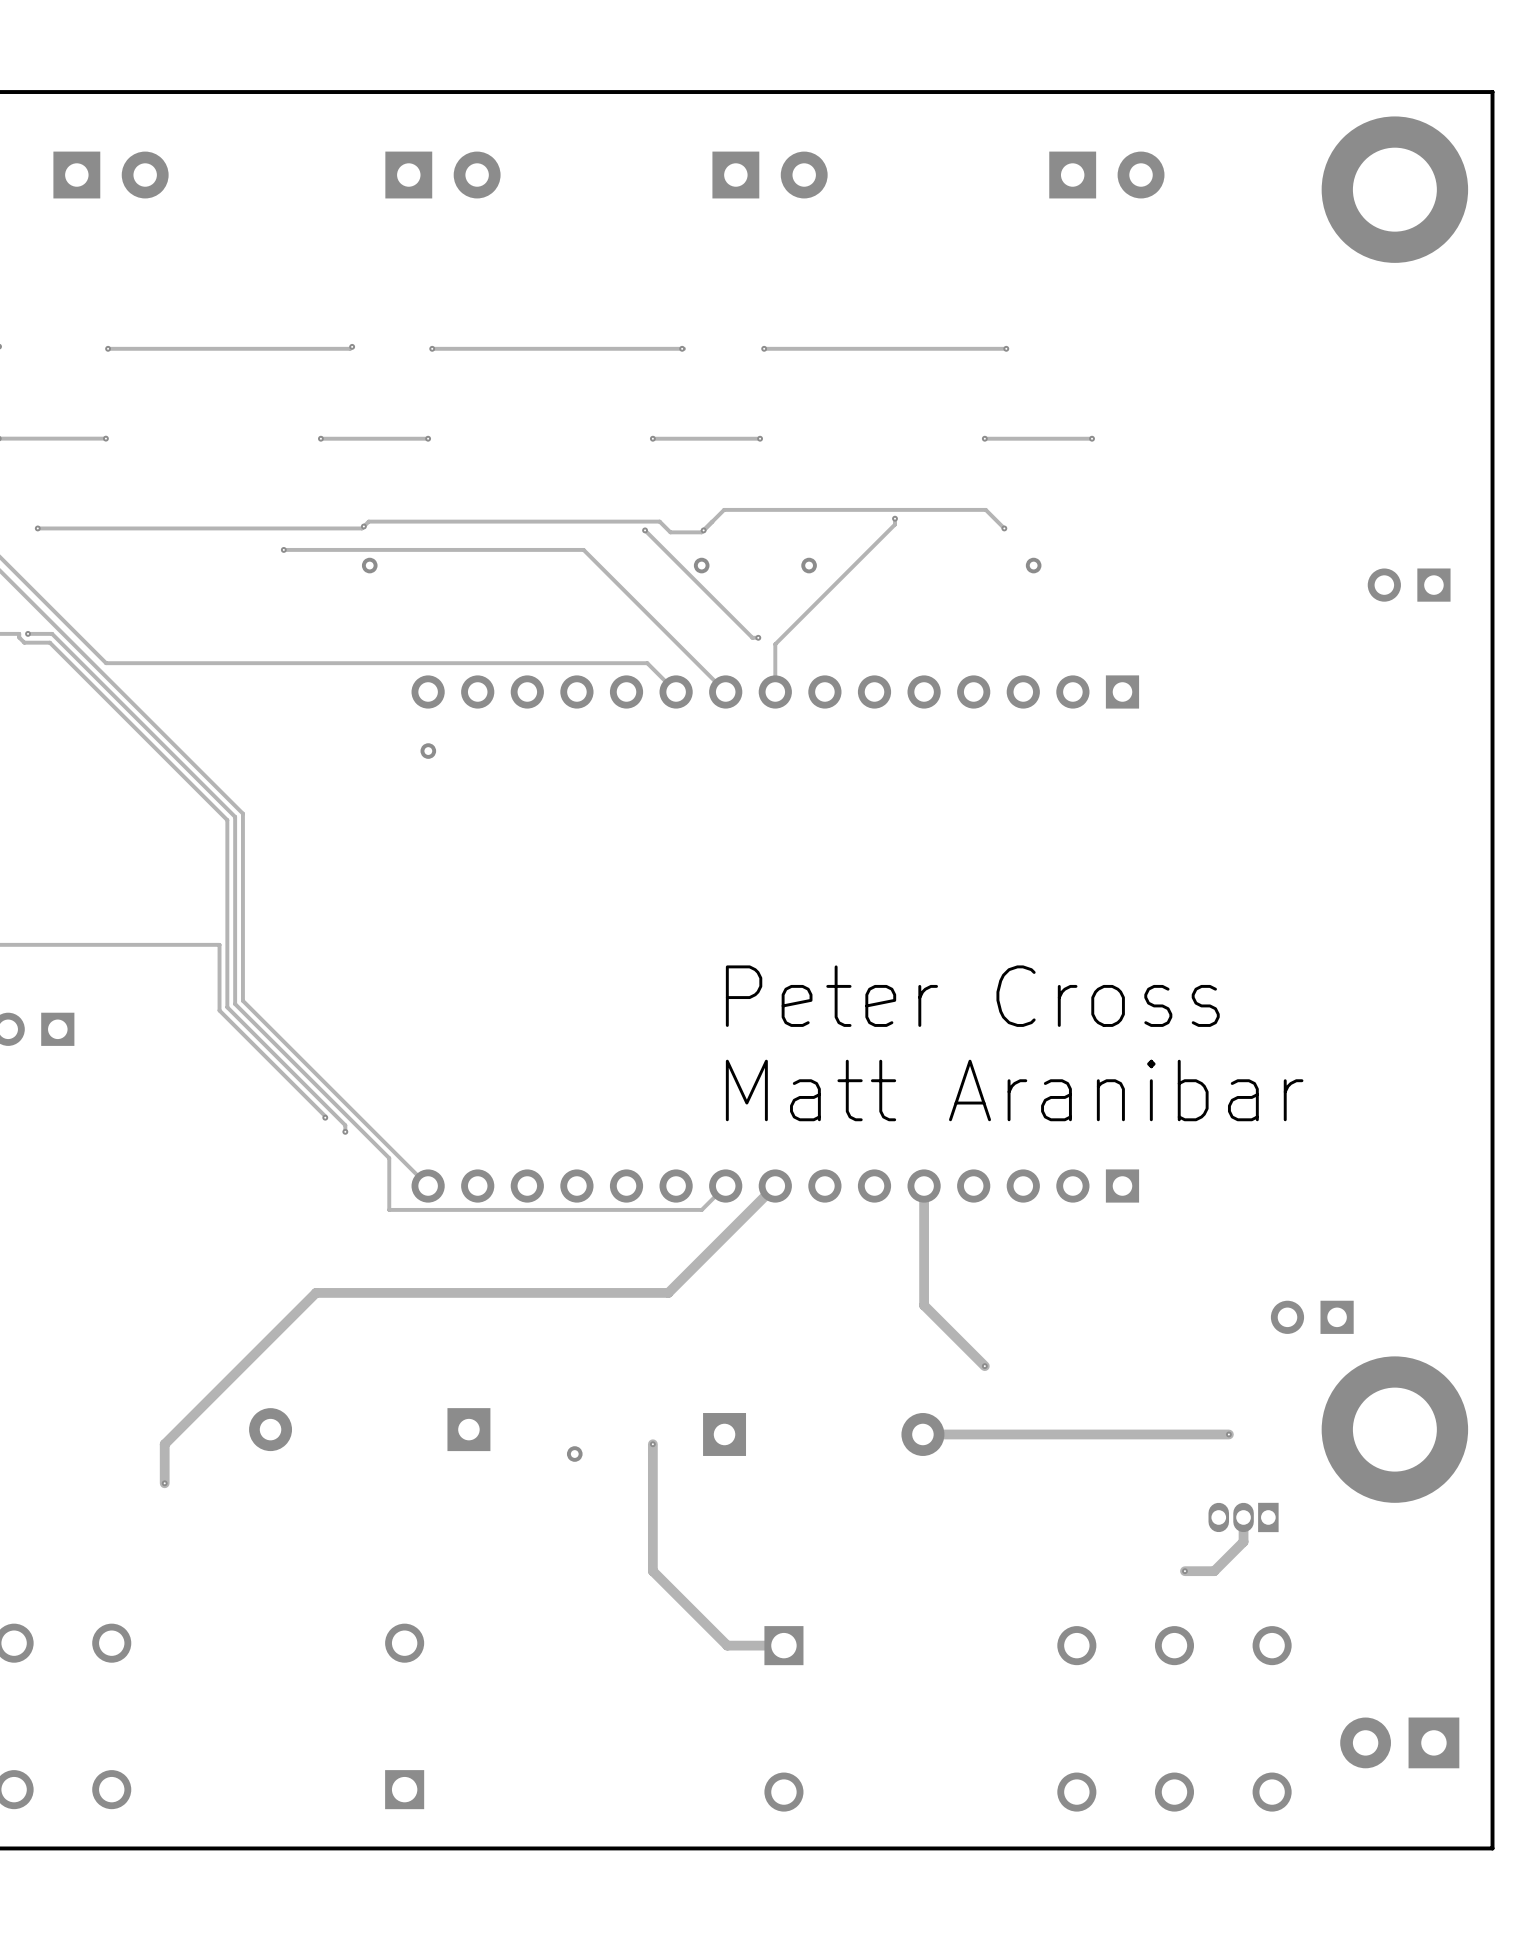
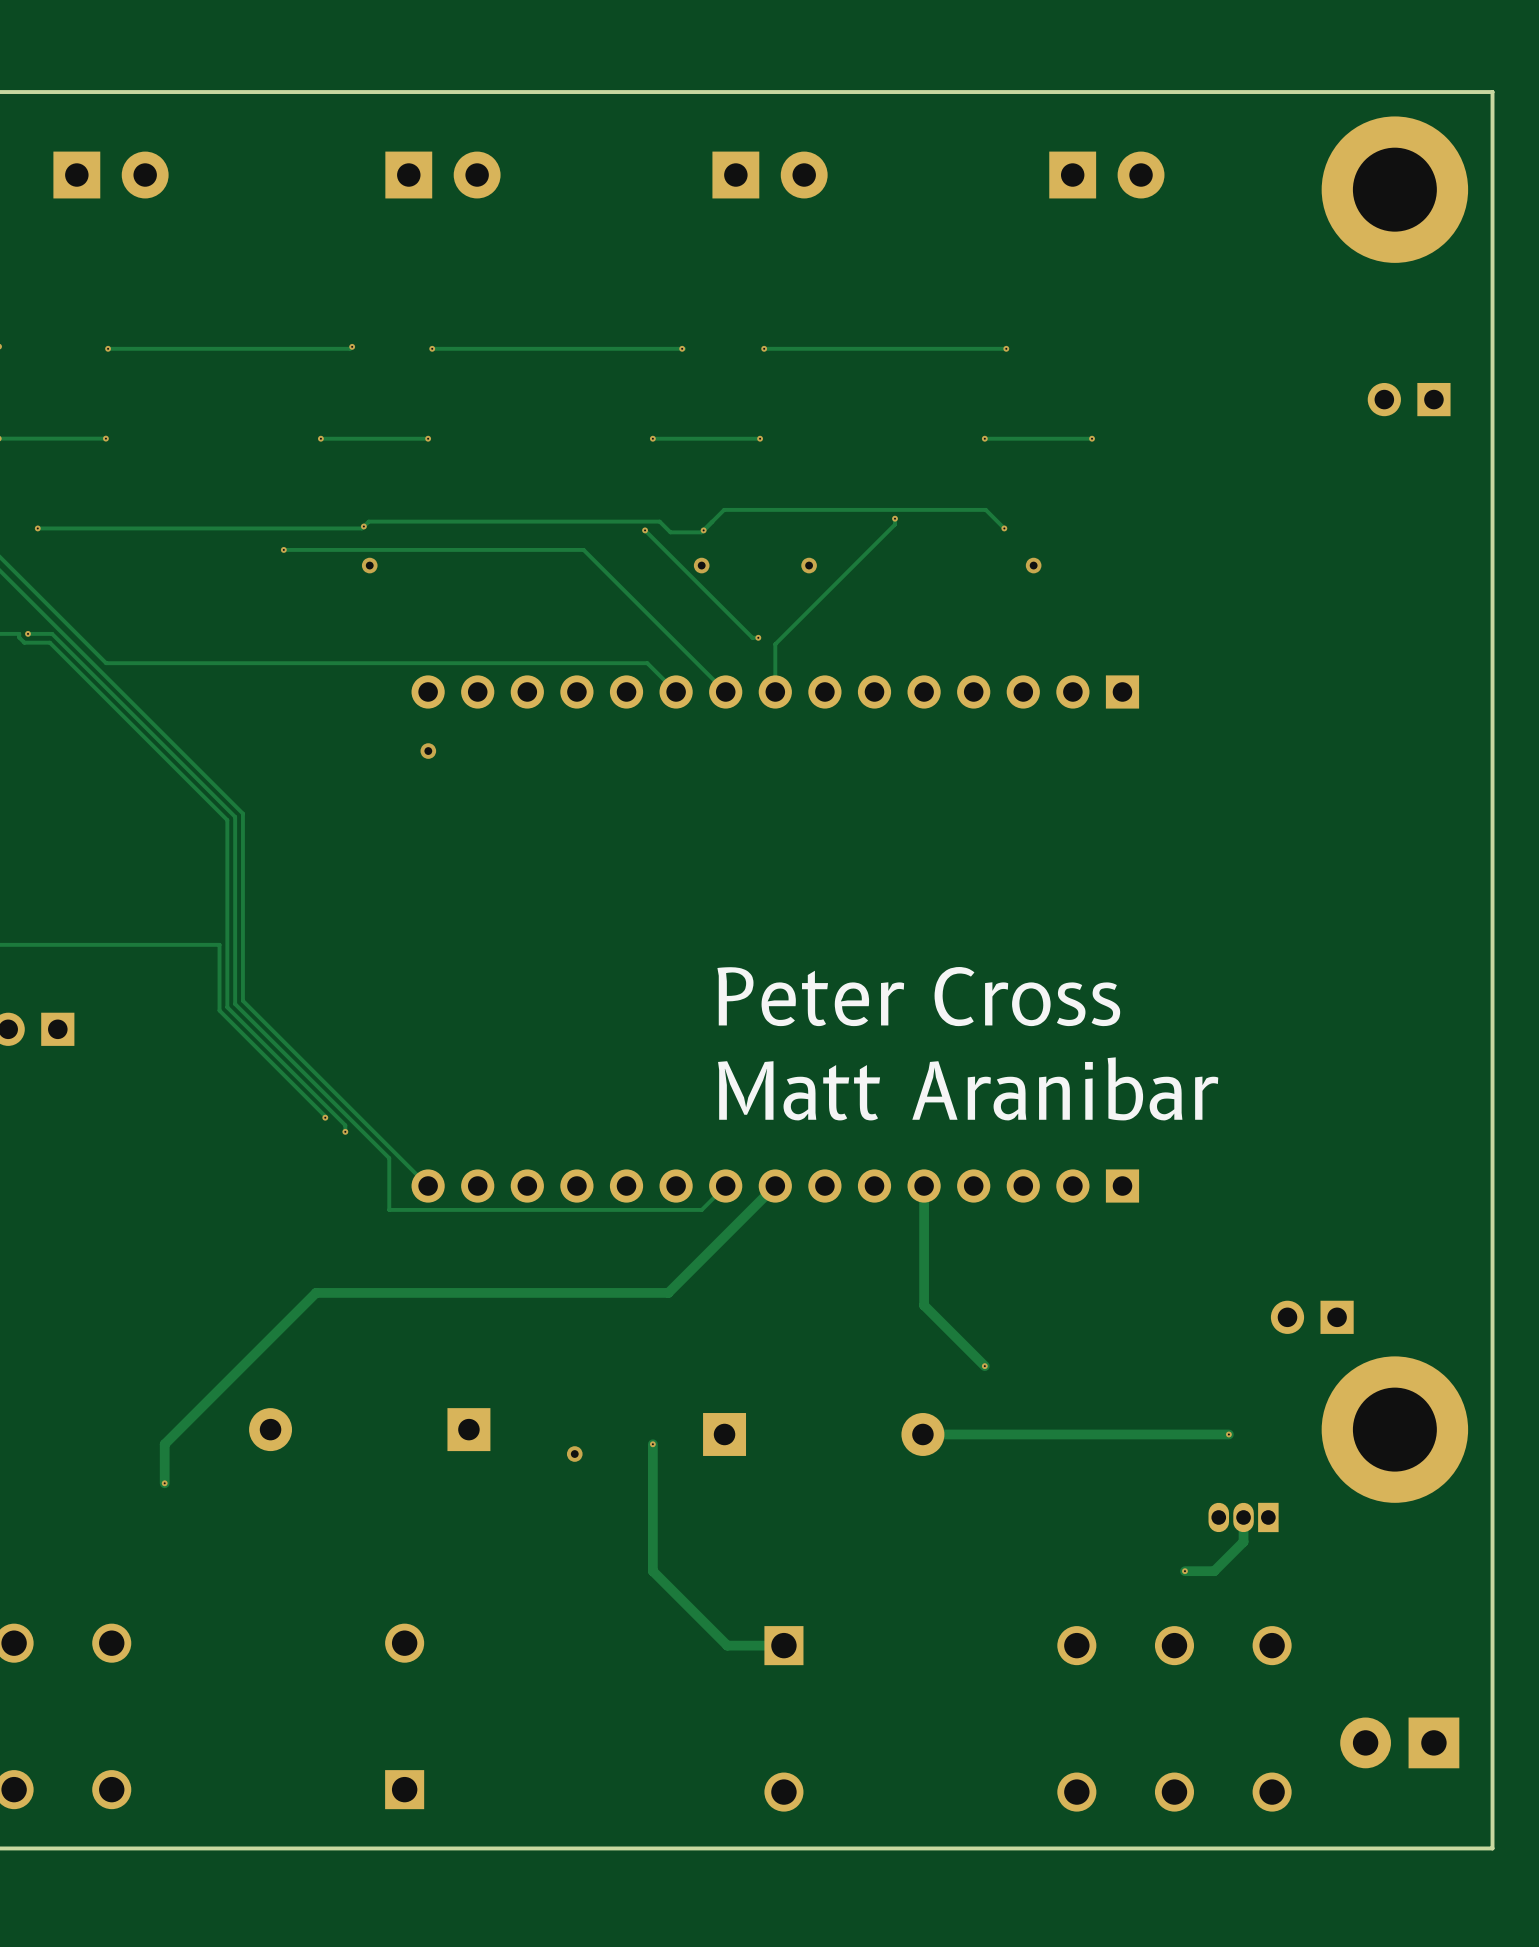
part position: (1409, 585) -> (1409, 399)

